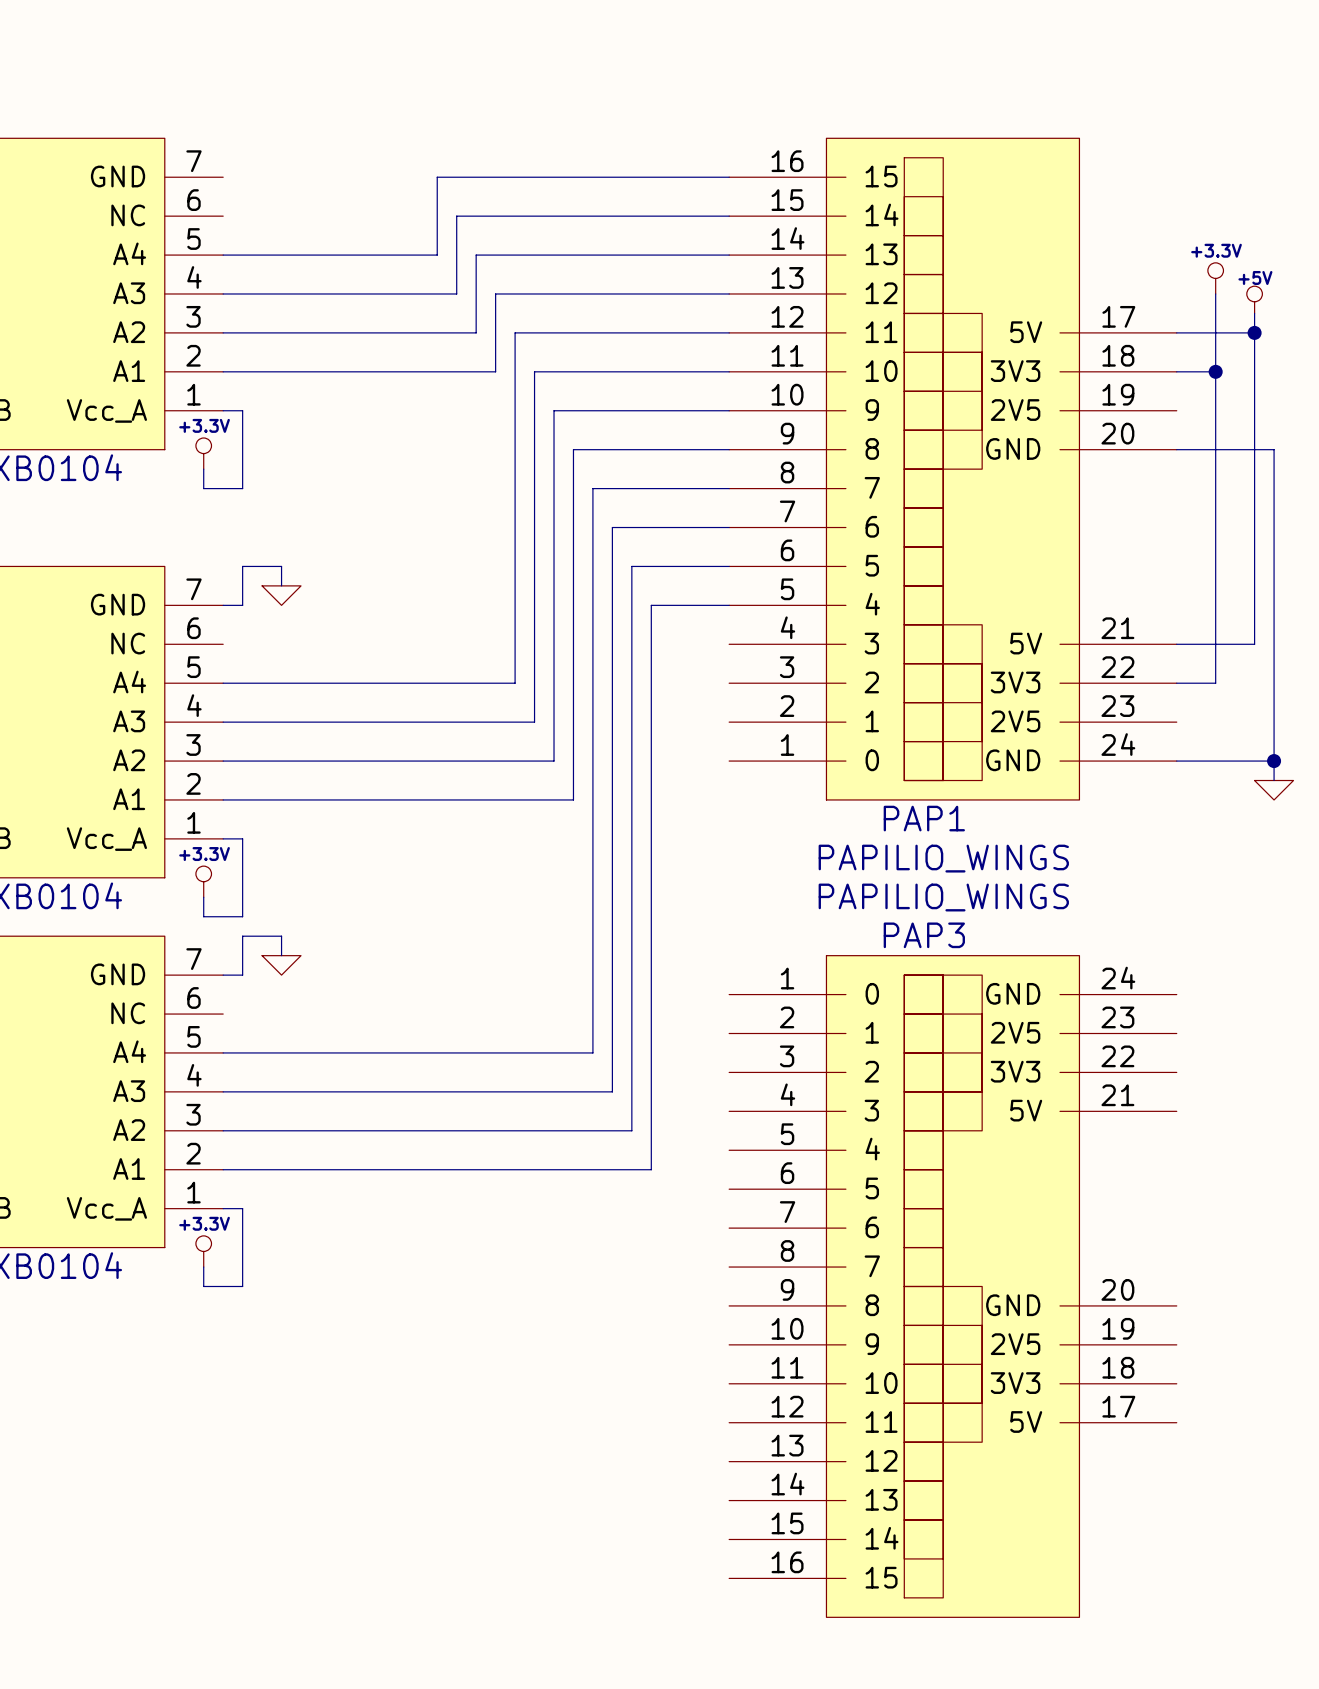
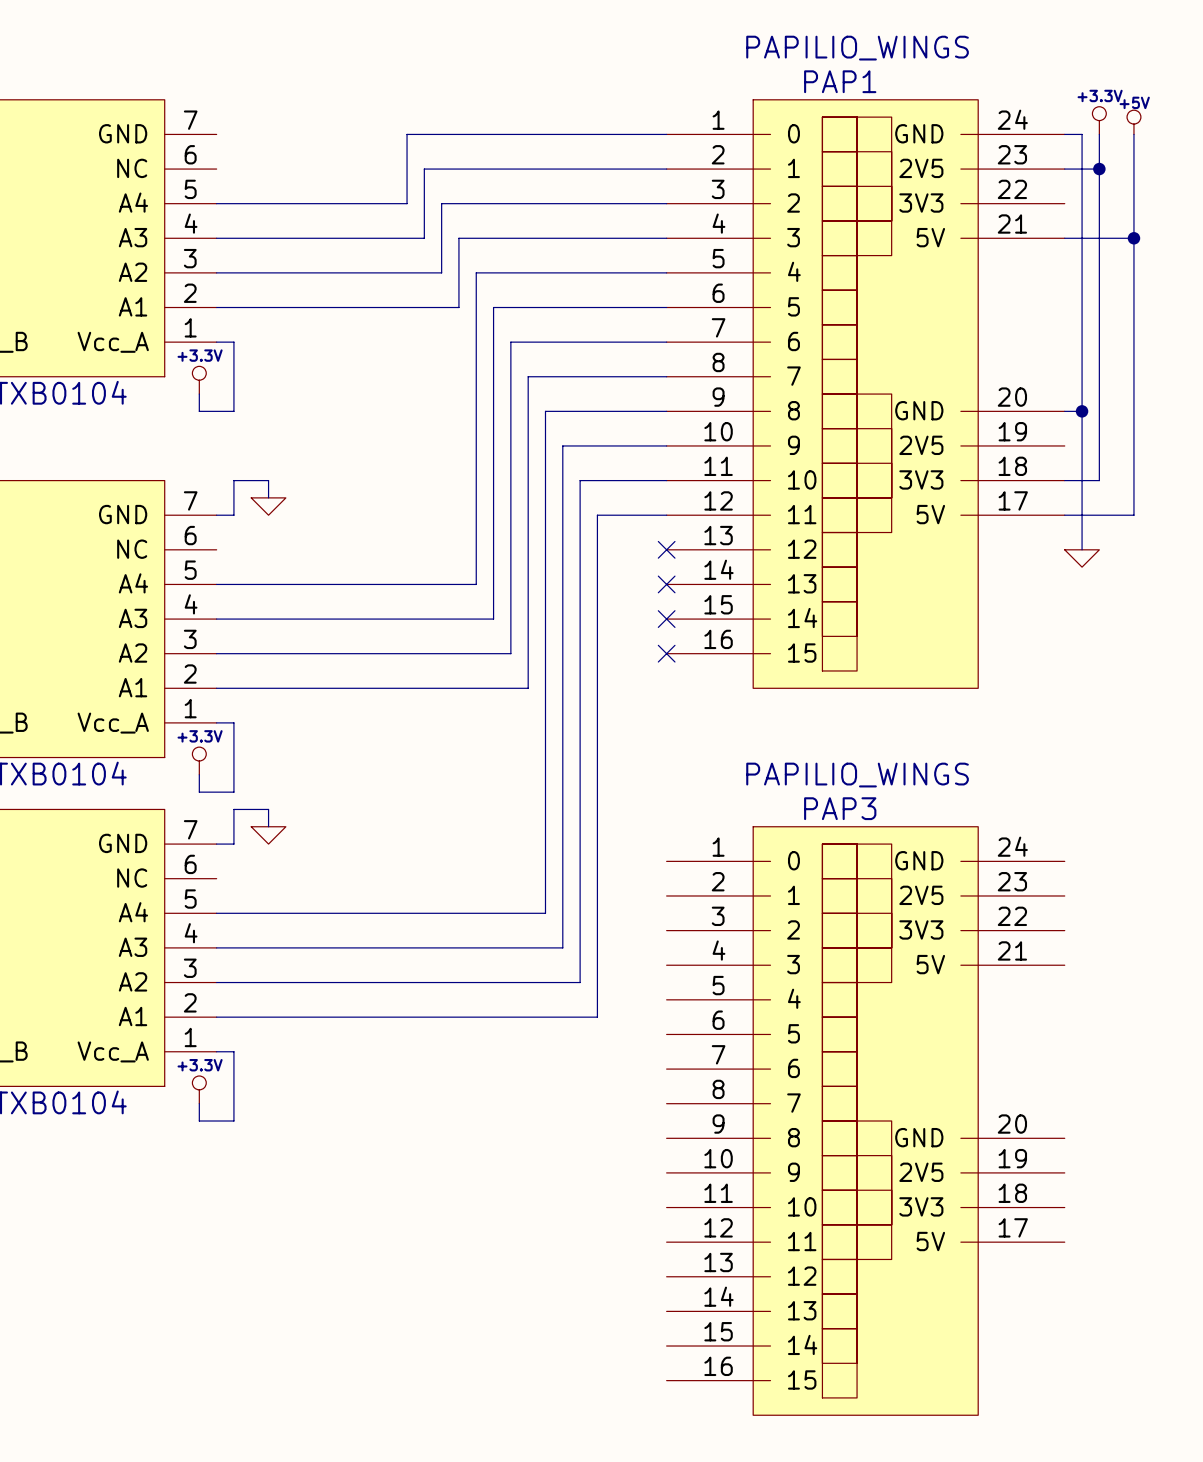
wire: none -> (1064, 134) (1082, 134) (1082, 549)
wire: none -> (1099, 134) (1099, 238)
wire: none -> (1133, 134) (1133, 255)
junction: none -> (1099, 169)
power symbol position: +3.3V (1215, 278) -> +3.3V (1099, 120)
power symbol position: +5V (1254, 299) -> +5V (1133, 122)
wire: (1176, 332) (1254, 332) -> (1064, 238) (1133, 238)
junction position: (1254, 332) -> (1133, 238)
wire: (1176, 371) (1215, 371) -> (1064, 169) (1099, 169)
junction: (1215, 371) -> none
wire: (1176, 449) (1274, 449) (1274, 780) -> none
PAP1 flip: as is (952, 469) -> up-down (865, 394)
wire: none -> (1064, 411) (1082, 411)
junction: none -> (1082, 411)
wire: (1215, 566) (1215, 683) (1176, 683) -> (1099, 480) (1064, 480)
wire: (1254, 605) (1254, 644) (1176, 644) -> (1133, 515) (1064, 515)
no-connect mark: none -> (666, 549)
no-connect mark: none -> (666, 584)
no-connect mark: none -> (666, 619)
no-connect mark: none -> (666, 653)
wire: (1176, 761) (1274, 761) -> none
junction: (1274, 761) -> none
power symbol position: (1274, 790) -> (1082, 558)

